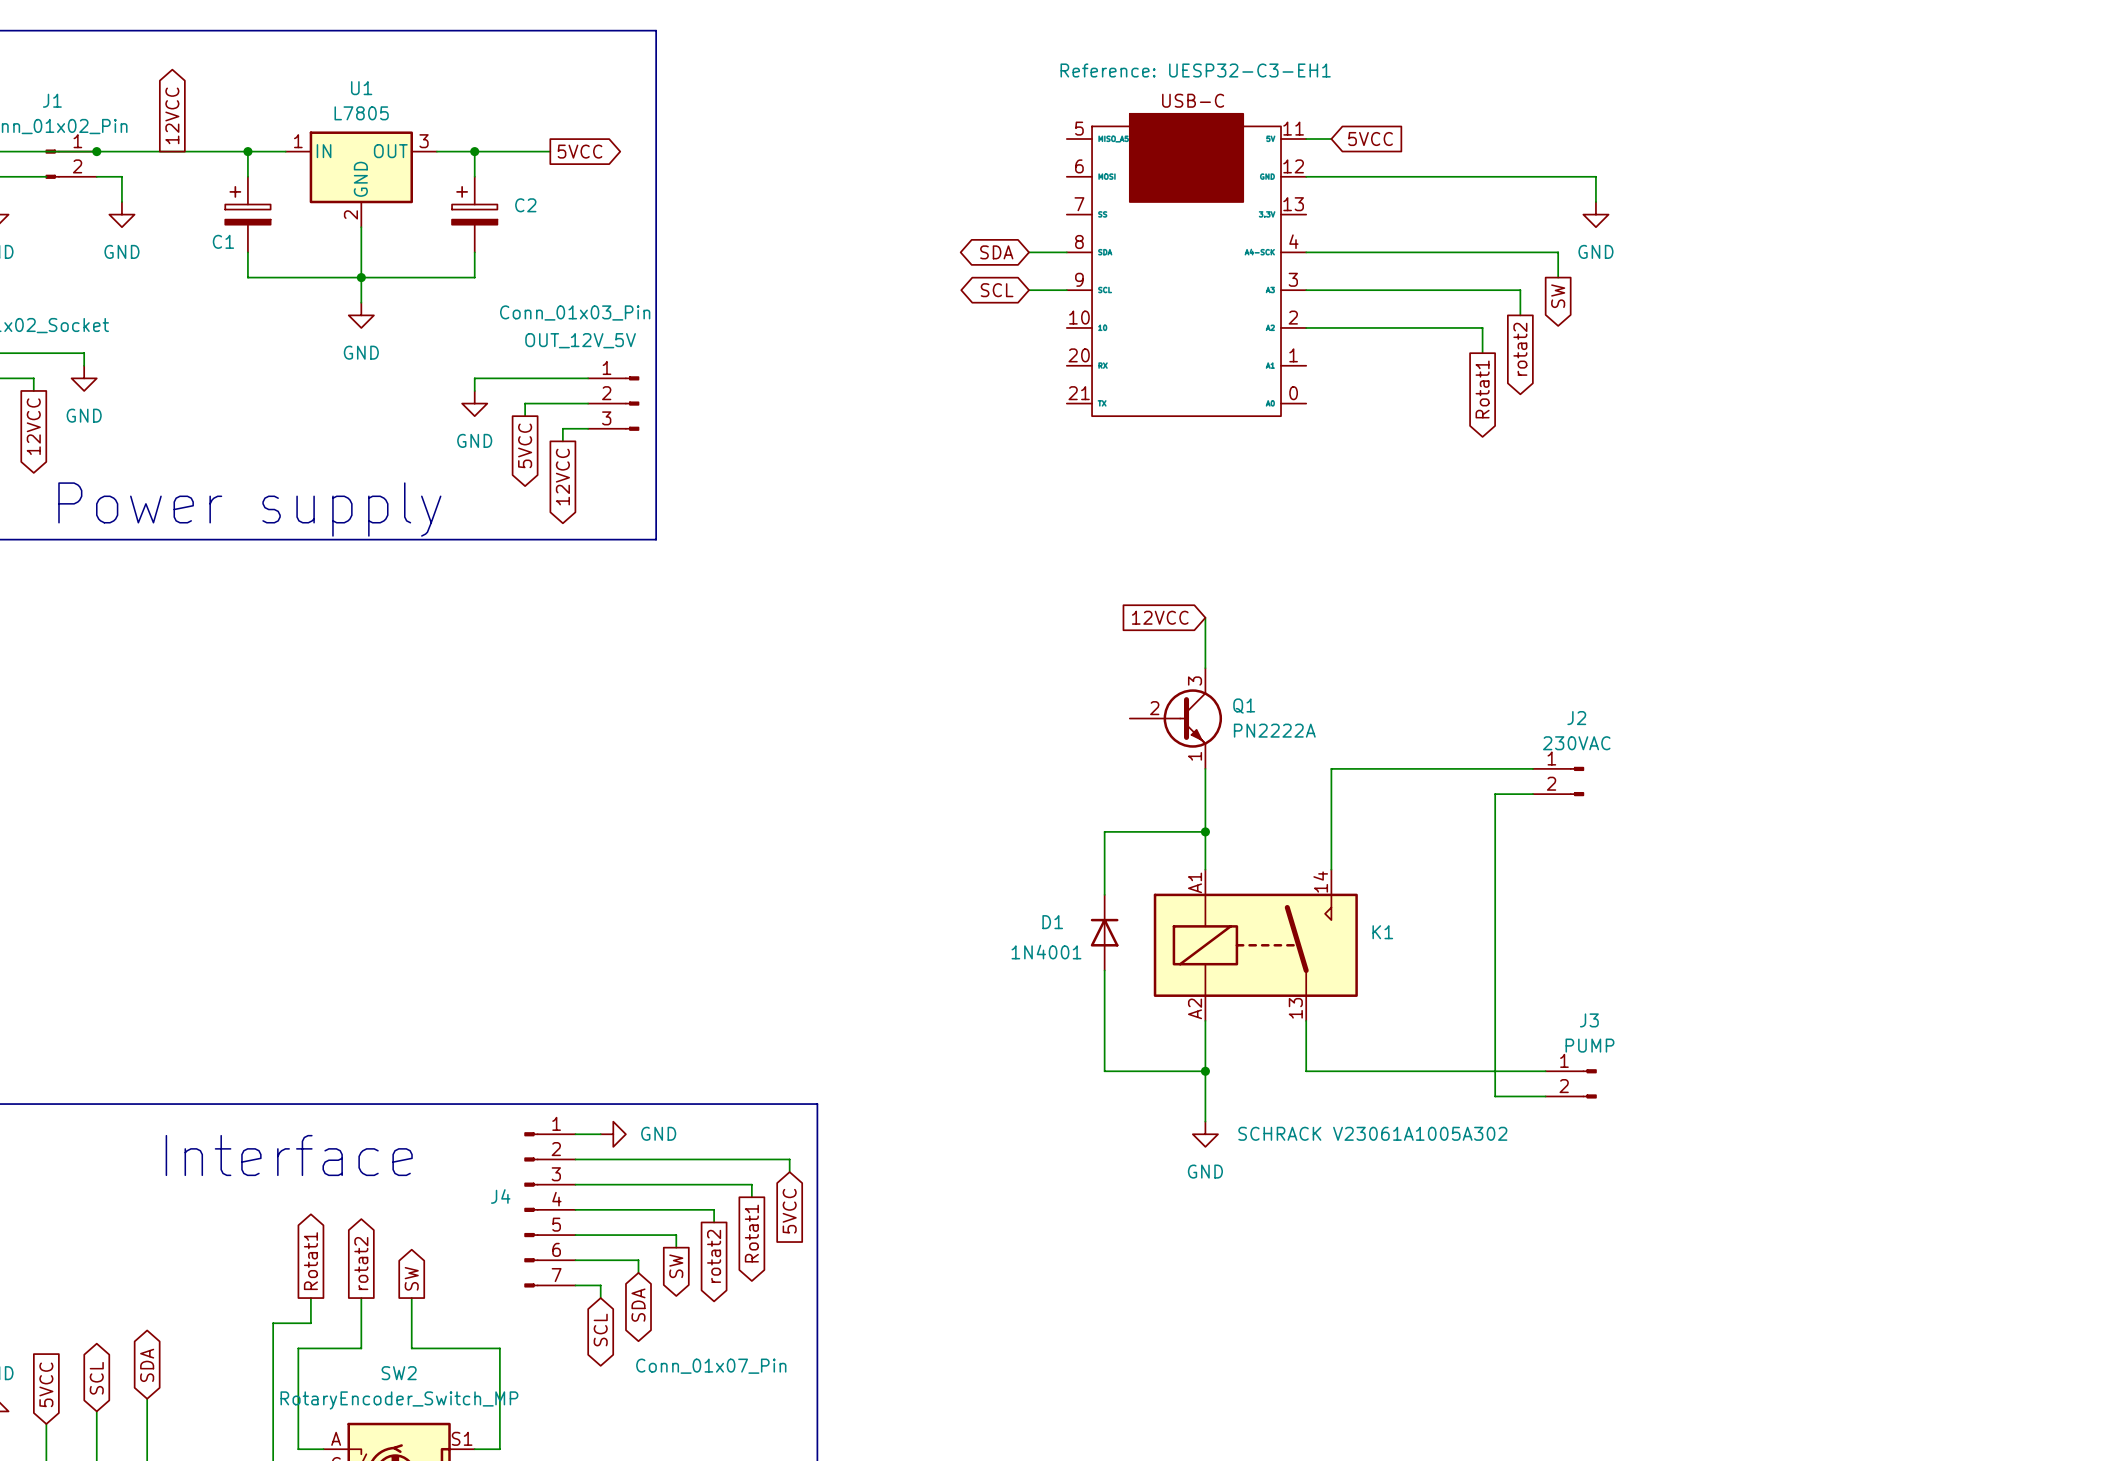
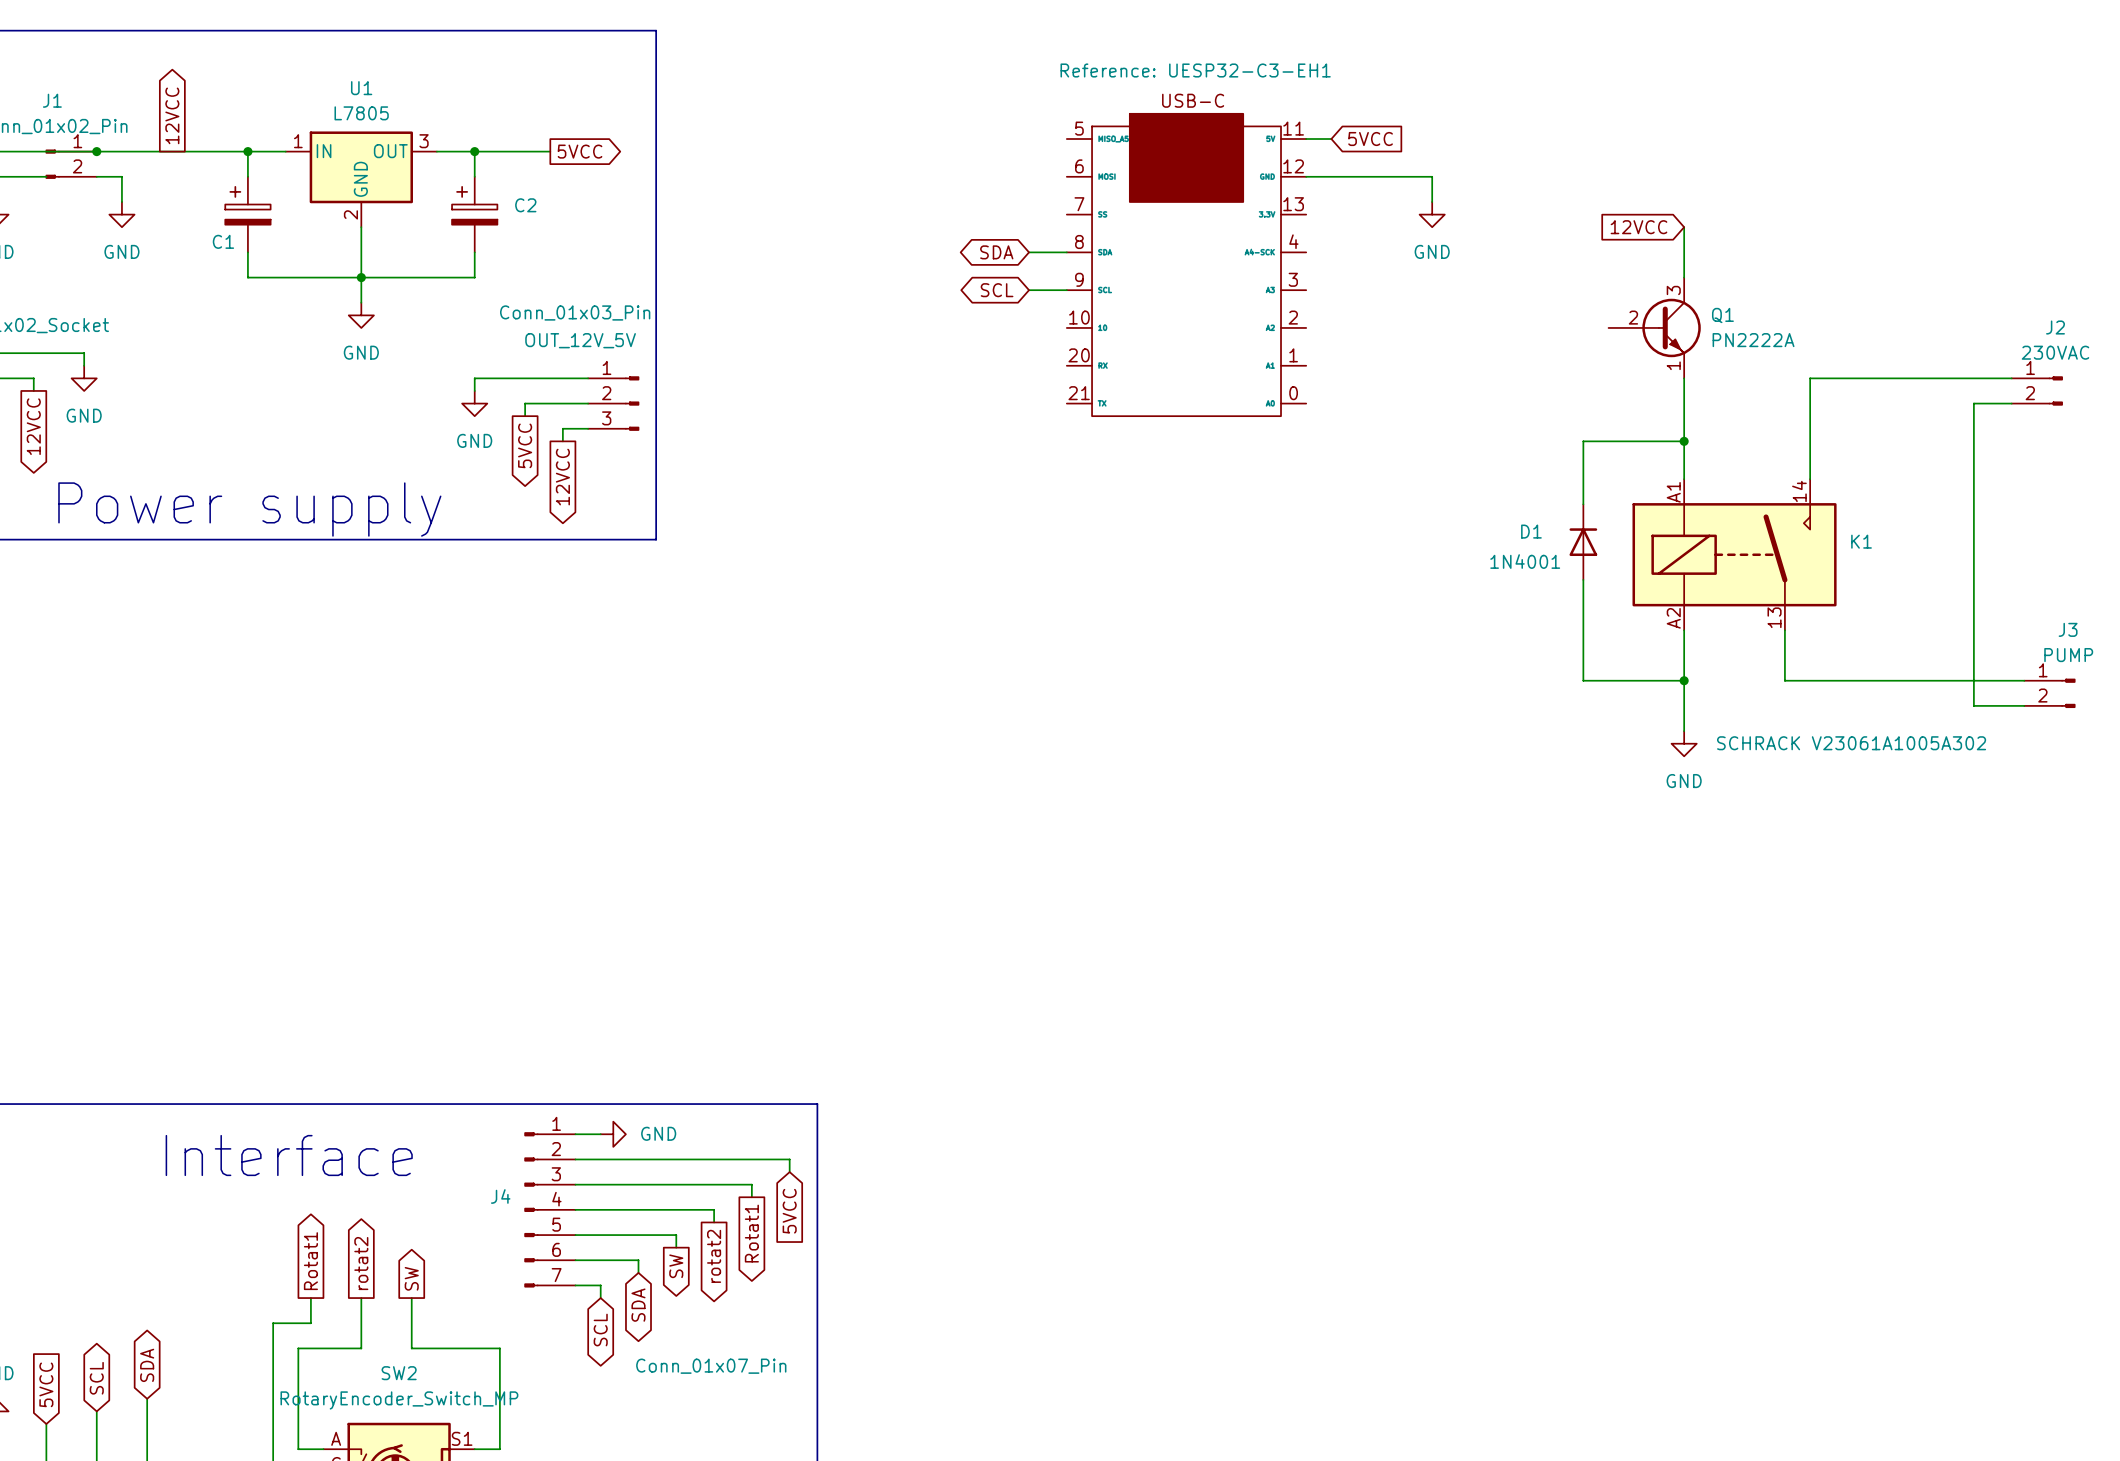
wire: (1432, 176) (1595, 176) (1595, 201) -> (1432, 176) (1432, 201)
power symbol position: GND (1595, 214) -> GND (1432, 214)
global label: none -> 12VCC (1638, 227)
wire: none -> (1684, 227) (1684, 277)
wire: (1306, 252) (1558, 252) (1558, 277) -> none
wire: (1306, 290) (1520, 290) (1520, 315) -> none
global label: SW (1558, 296) -> none
wire: (1306, 327) (1482, 327) (1482, 353) -> none
global label: rotat2 (1520, 349) -> none
wire: none -> (1684, 378) (1684, 479)
wire: none -> (2011, 378) (1810, 378) (1810, 479)
global label: Rotat1 (1482, 389) -> none
wire: none -> (2011, 403) (1973, 403) (1973, 705) (2024, 705)
wire: none -> (1684, 441) (1583, 441) (1583, 504)
junction: none -> (1684, 441)
wire: none -> (1583, 579) (1583, 680) (1684, 680)
global label: 12VCC (1160, 617) -> none
wire: (1205, 617) (1205, 668) -> none
wire: none -> (1684, 630) (1684, 731)
wire: none -> (1784, 630) (1784, 680) (2024, 680)
junction: none -> (1684, 680)
Q1 position: (1175, 718) -> (1654, 327)
power symbol: none -> GND (1684, 743)
wire: (1205, 768) (1205, 869) -> none
wire: (1532, 768) (1331, 768) (1331, 869) -> none
J2 position: (1558, 781) -> (2037, 390)
wire: (1532, 794) (1495, 794) (1495, 1096) (1545, 1096) -> none
wire: (1205, 831) (1104, 831) (1104, 894) -> none
junction: (1205, 831) -> none
D1 position: (1104, 932) -> (1583, 542)
K1 position: (1255, 945) -> (1734, 554)
wire: (1104, 970) (1104, 1071) (1205, 1071) -> none
wire: (1205, 1020) (1205, 1121) -> none
wire: (1306, 1020) (1306, 1071) (1545, 1071) -> none
junction: (1205, 1071) -> none
J3 position: (1571, 1083) -> (2049, 693)
power symbol: GND (1205, 1134) -> none

